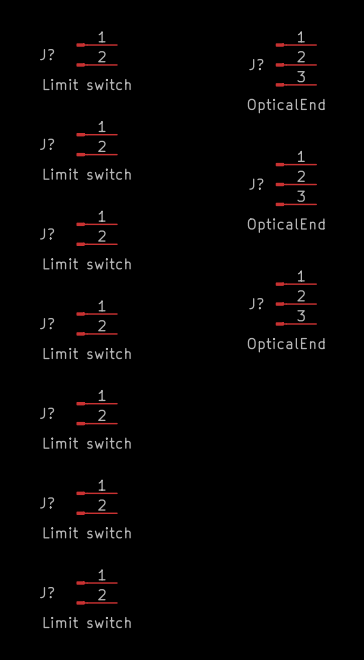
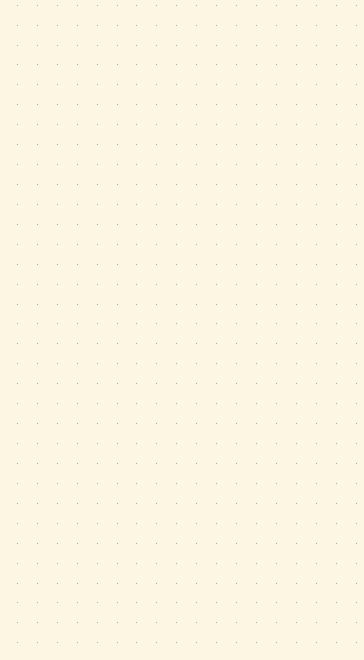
J?: Limit switch (96, 54) -> none
J?: OpticalEnd (296, 64) -> none
J?: Limit switch (96, 144) -> none
J?: OpticalEnd (296, 184) -> none
J?: Limit switch (96, 234) -> none
J?: OpticalEnd (296, 304) -> none
J?: Limit switch (96, 323) -> none
J?: Limit switch (96, 413) -> none
J?: Limit switch (96, 503) -> none
J?: Limit switch (96, 592) -> none

